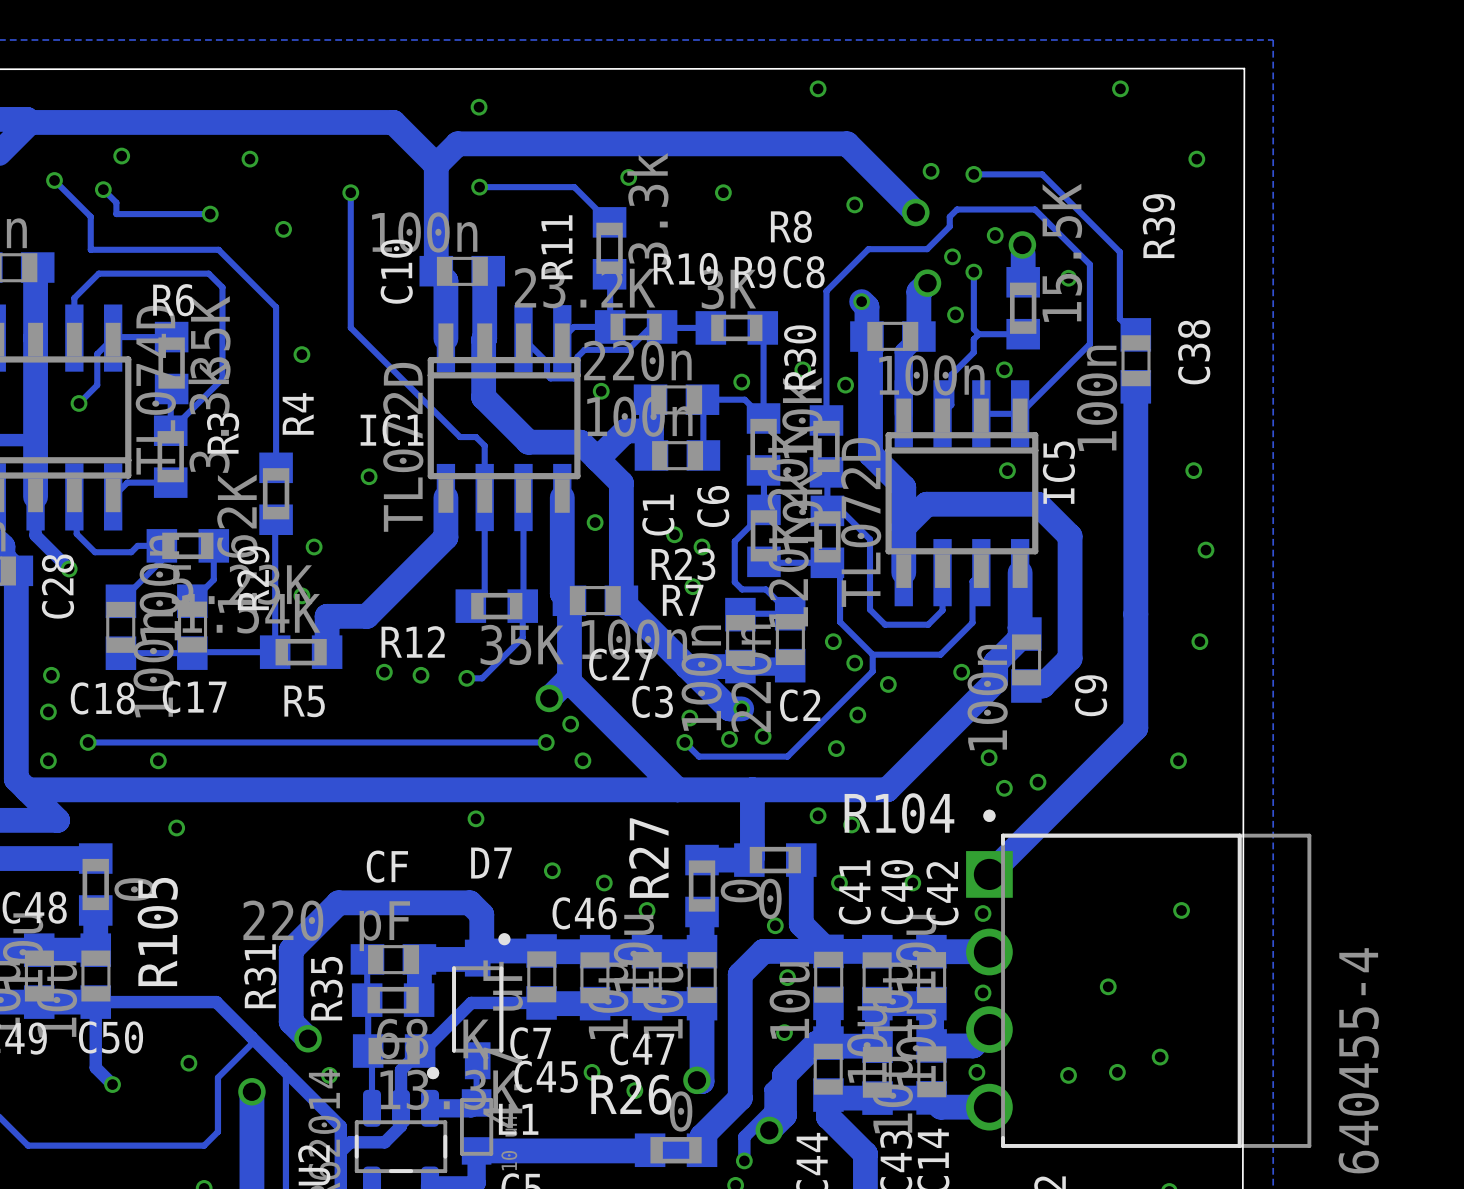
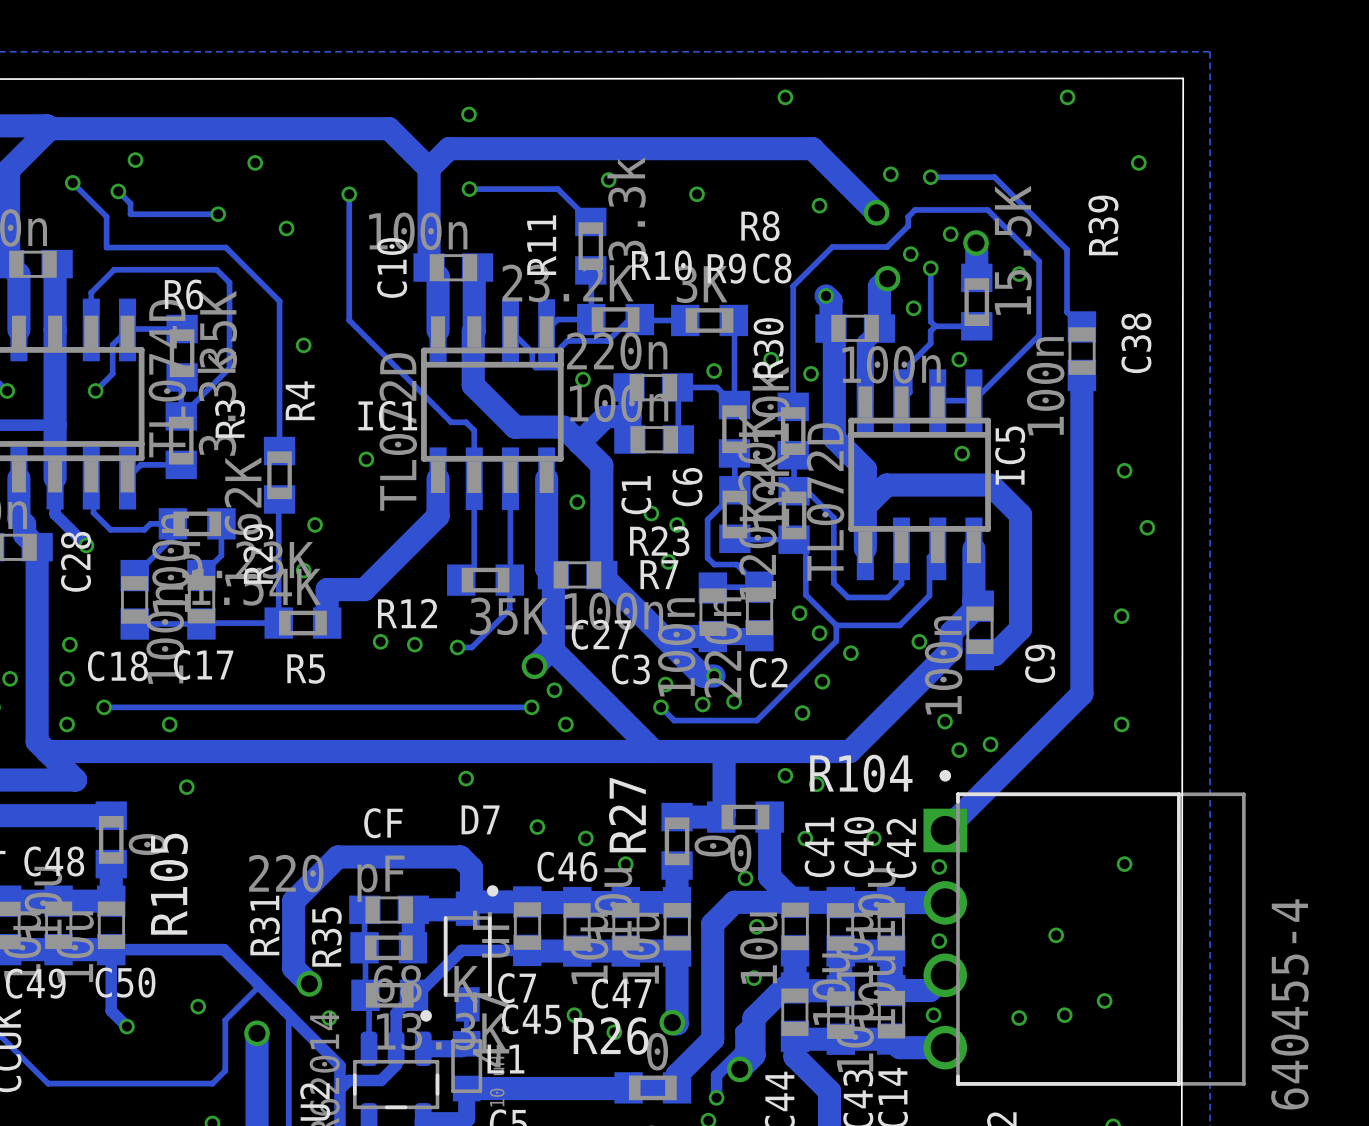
via position: (1193, 470) -> (1124, 470)
via position: (1199, 641) -> (1121, 616)

